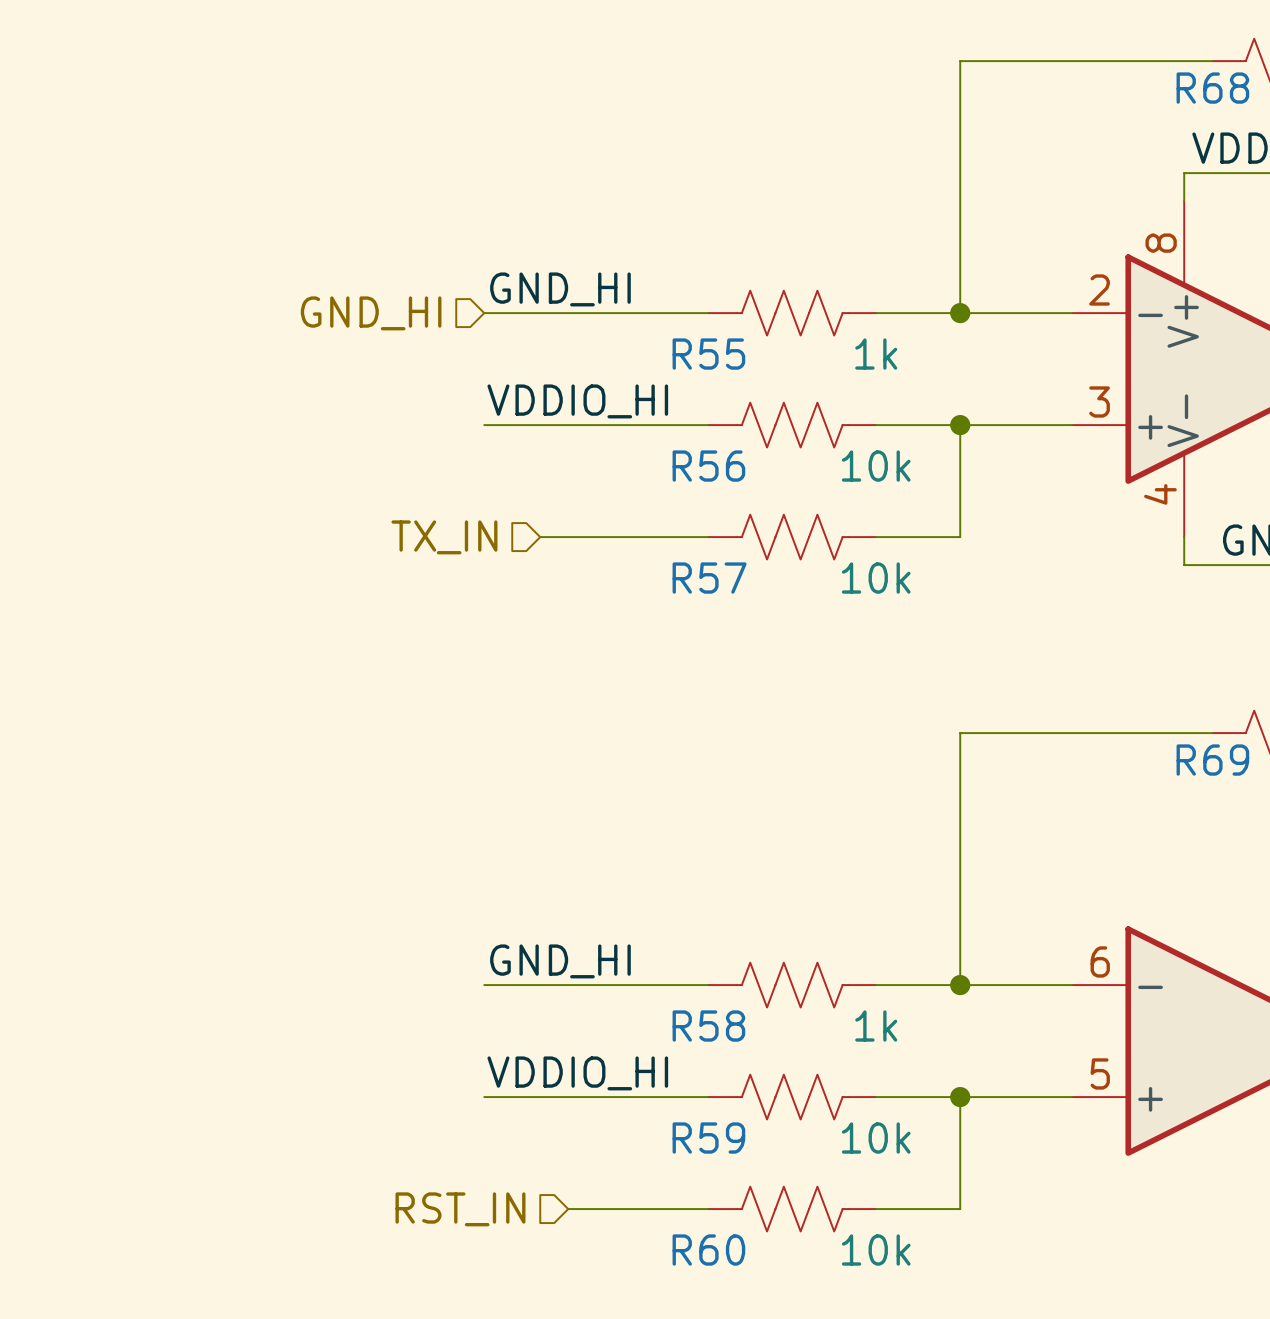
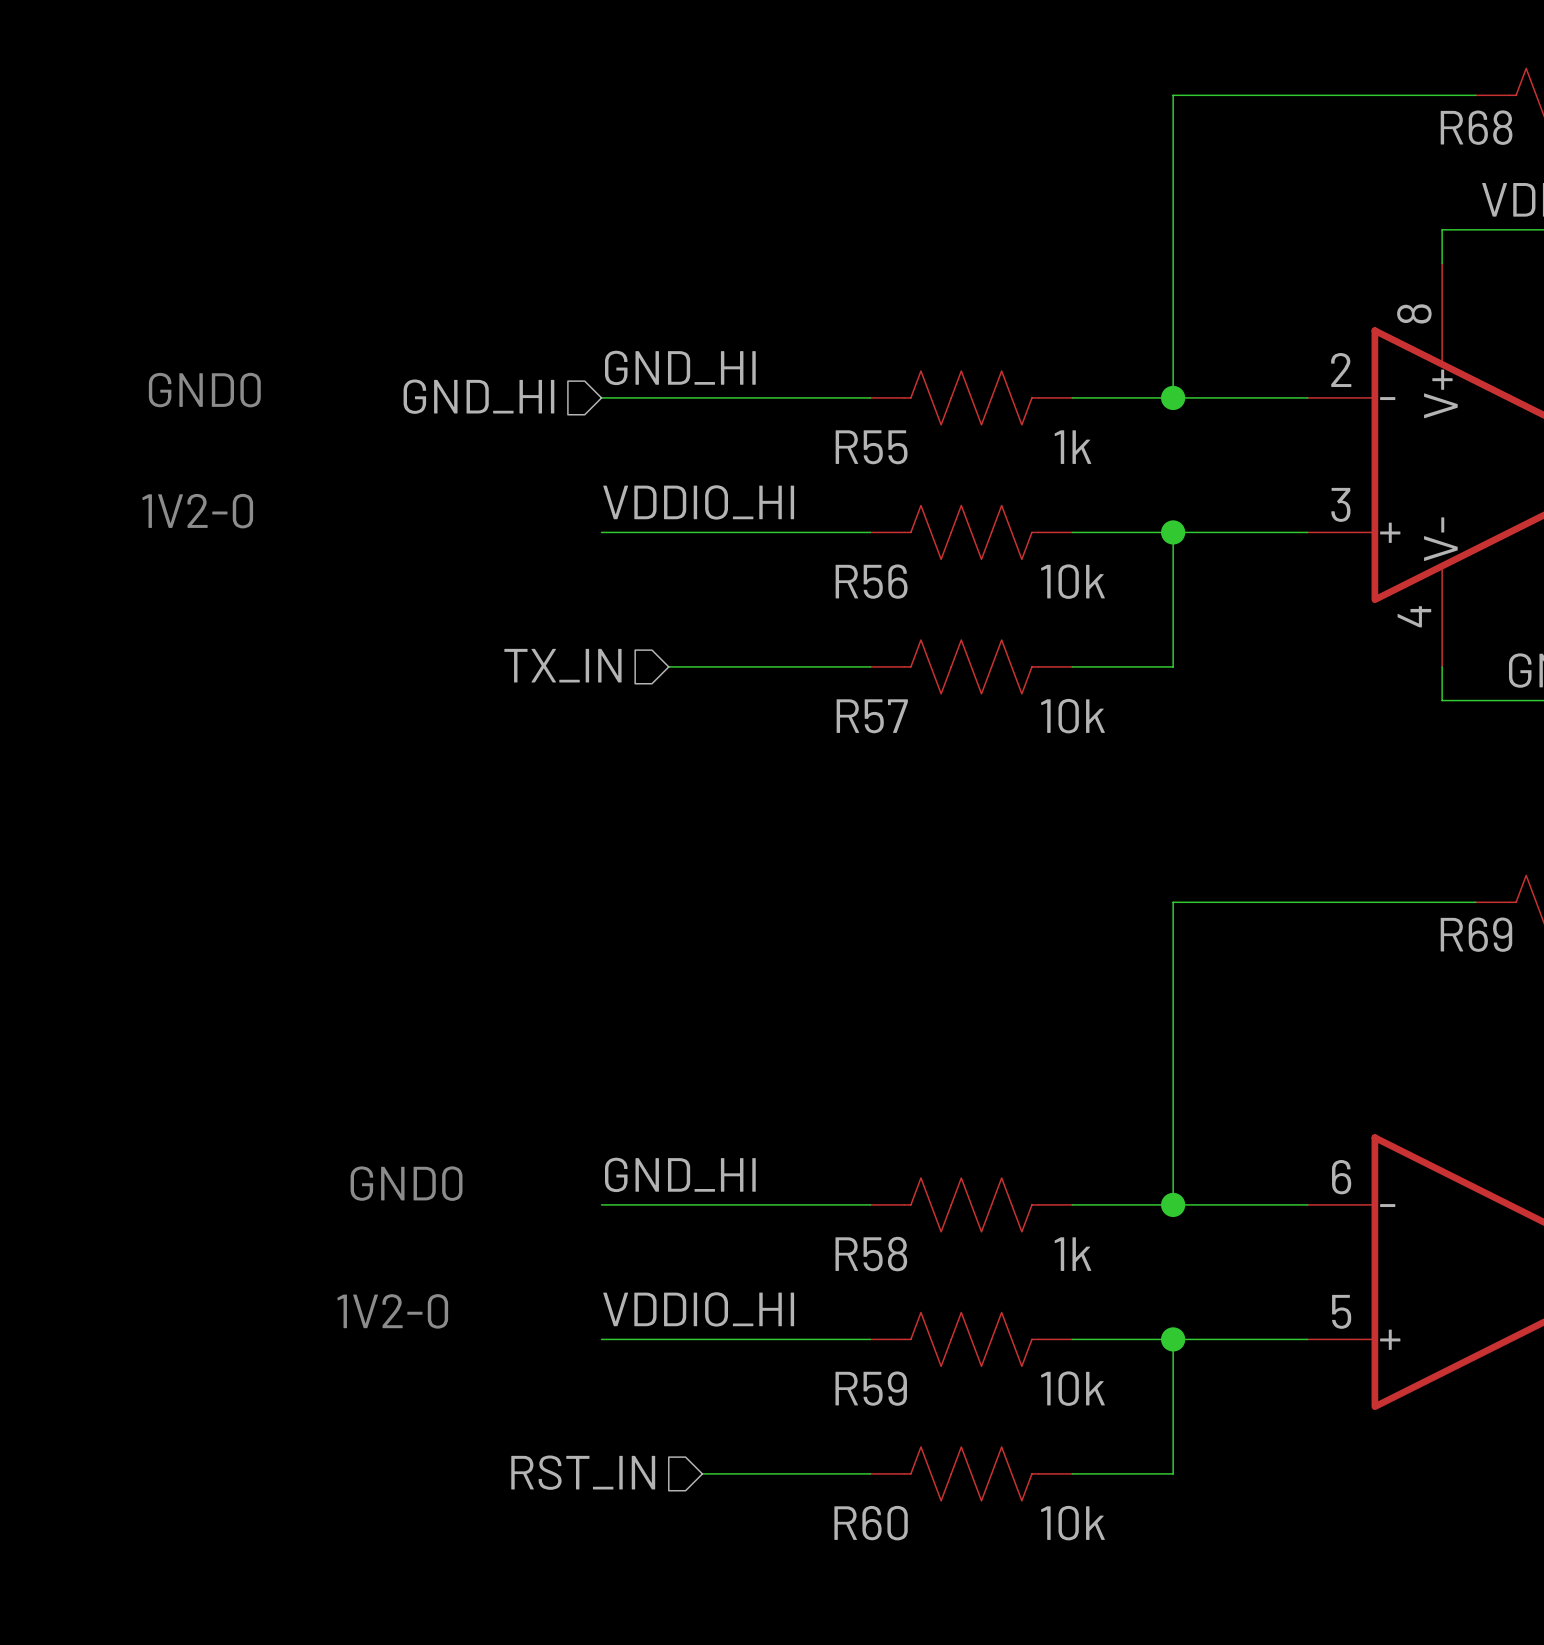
text: none -> GND0 (204, 390)
text: none -> 1V2-0 (197, 511)
text: none -> GND0 (406, 1183)
text: none -> 1V2-0 (392, 1311)

